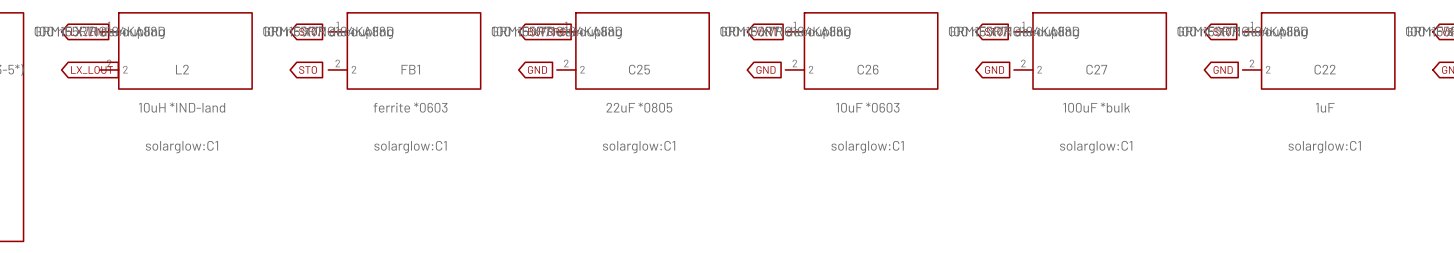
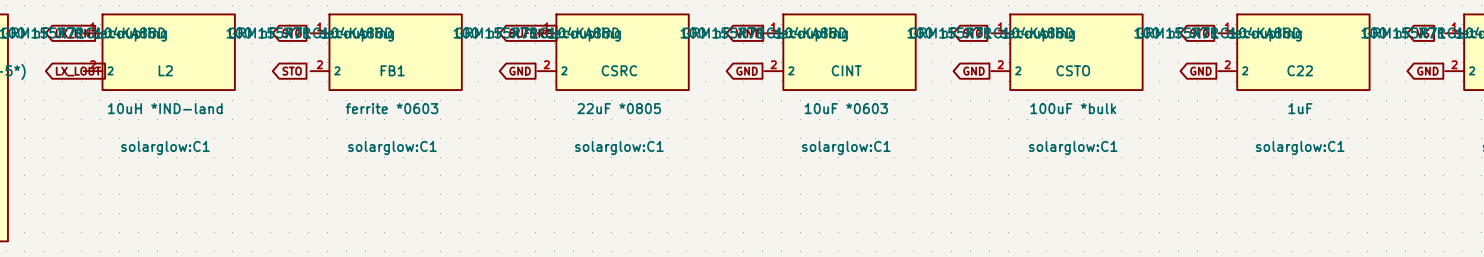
C25 name: C25 (639, 69) -> CSRC (619, 70)
C26 name: C26 (868, 69) -> CINT (846, 70)
C27 name: C27 (1096, 69) -> CSTO (1073, 70)

